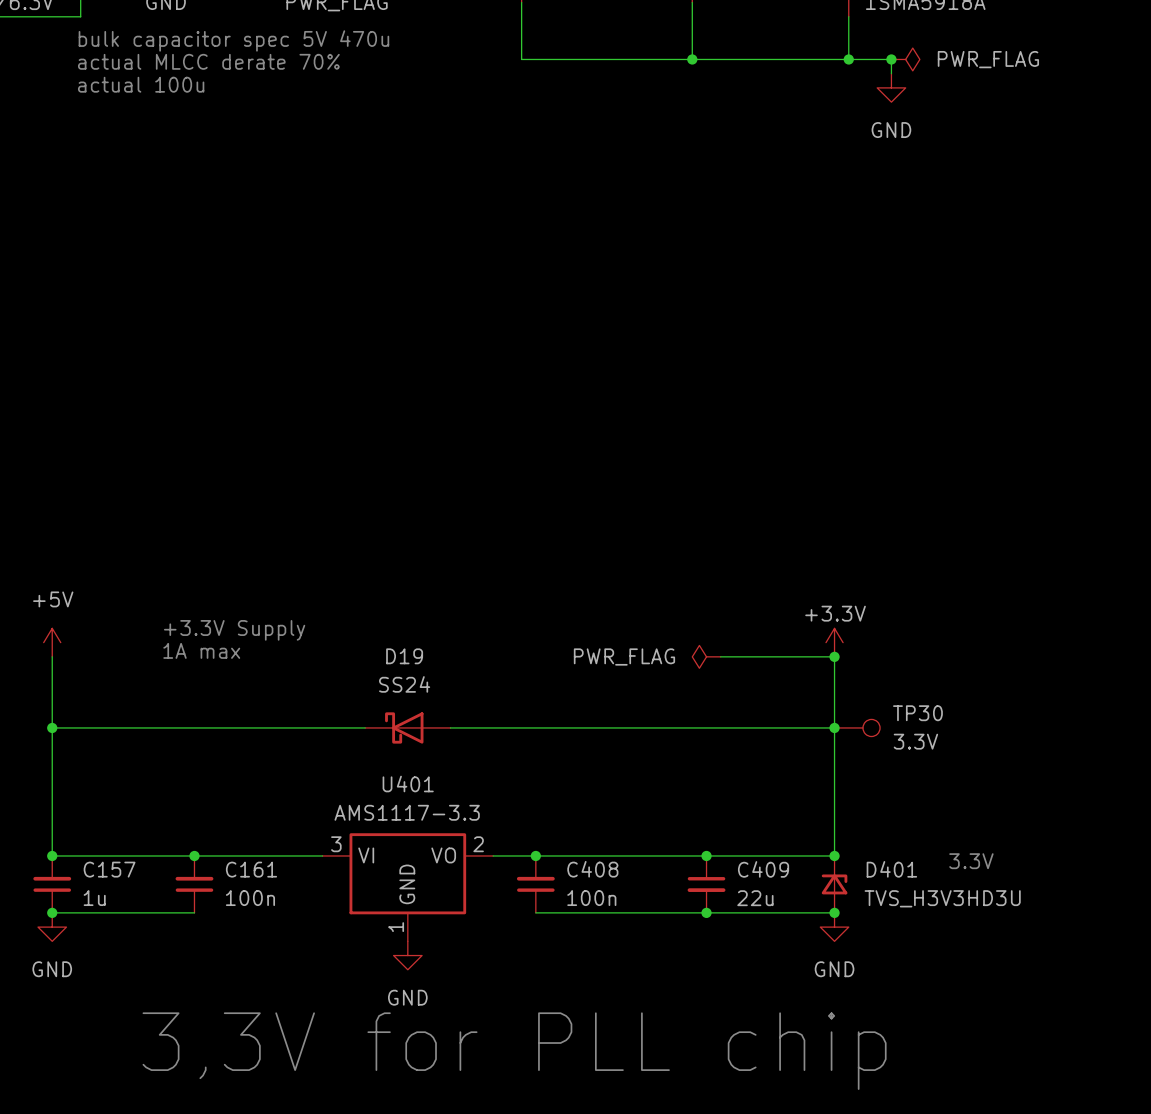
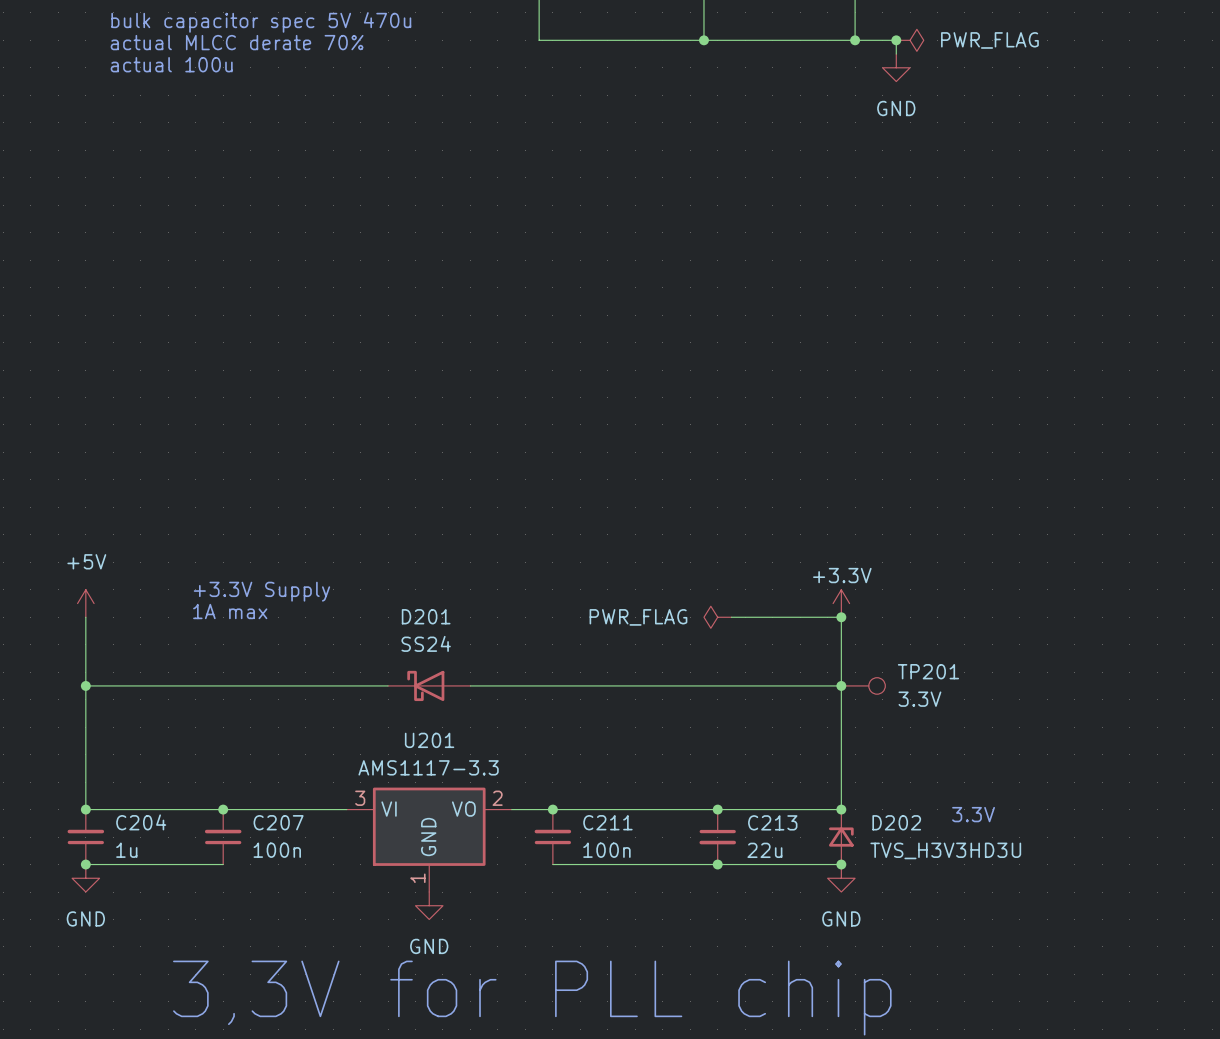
D19 name: D19 (404, 656) -> D201 (426, 616)
TP30 name: TP30 (917, 713) -> TP201 (928, 671)
U401 name: U401 (408, 784) -> U201 (429, 740)
C157 name: C157 (109, 869) -> C204 (141, 822)
C161 name: C161 (251, 869) -> C207 (278, 822)
C408 name: C408 (592, 869) -> C211 (607, 822)
C409 name: C409 (763, 869) -> C213 (772, 822)
D401 name: D401 (891, 869) -> D202 (896, 822)

